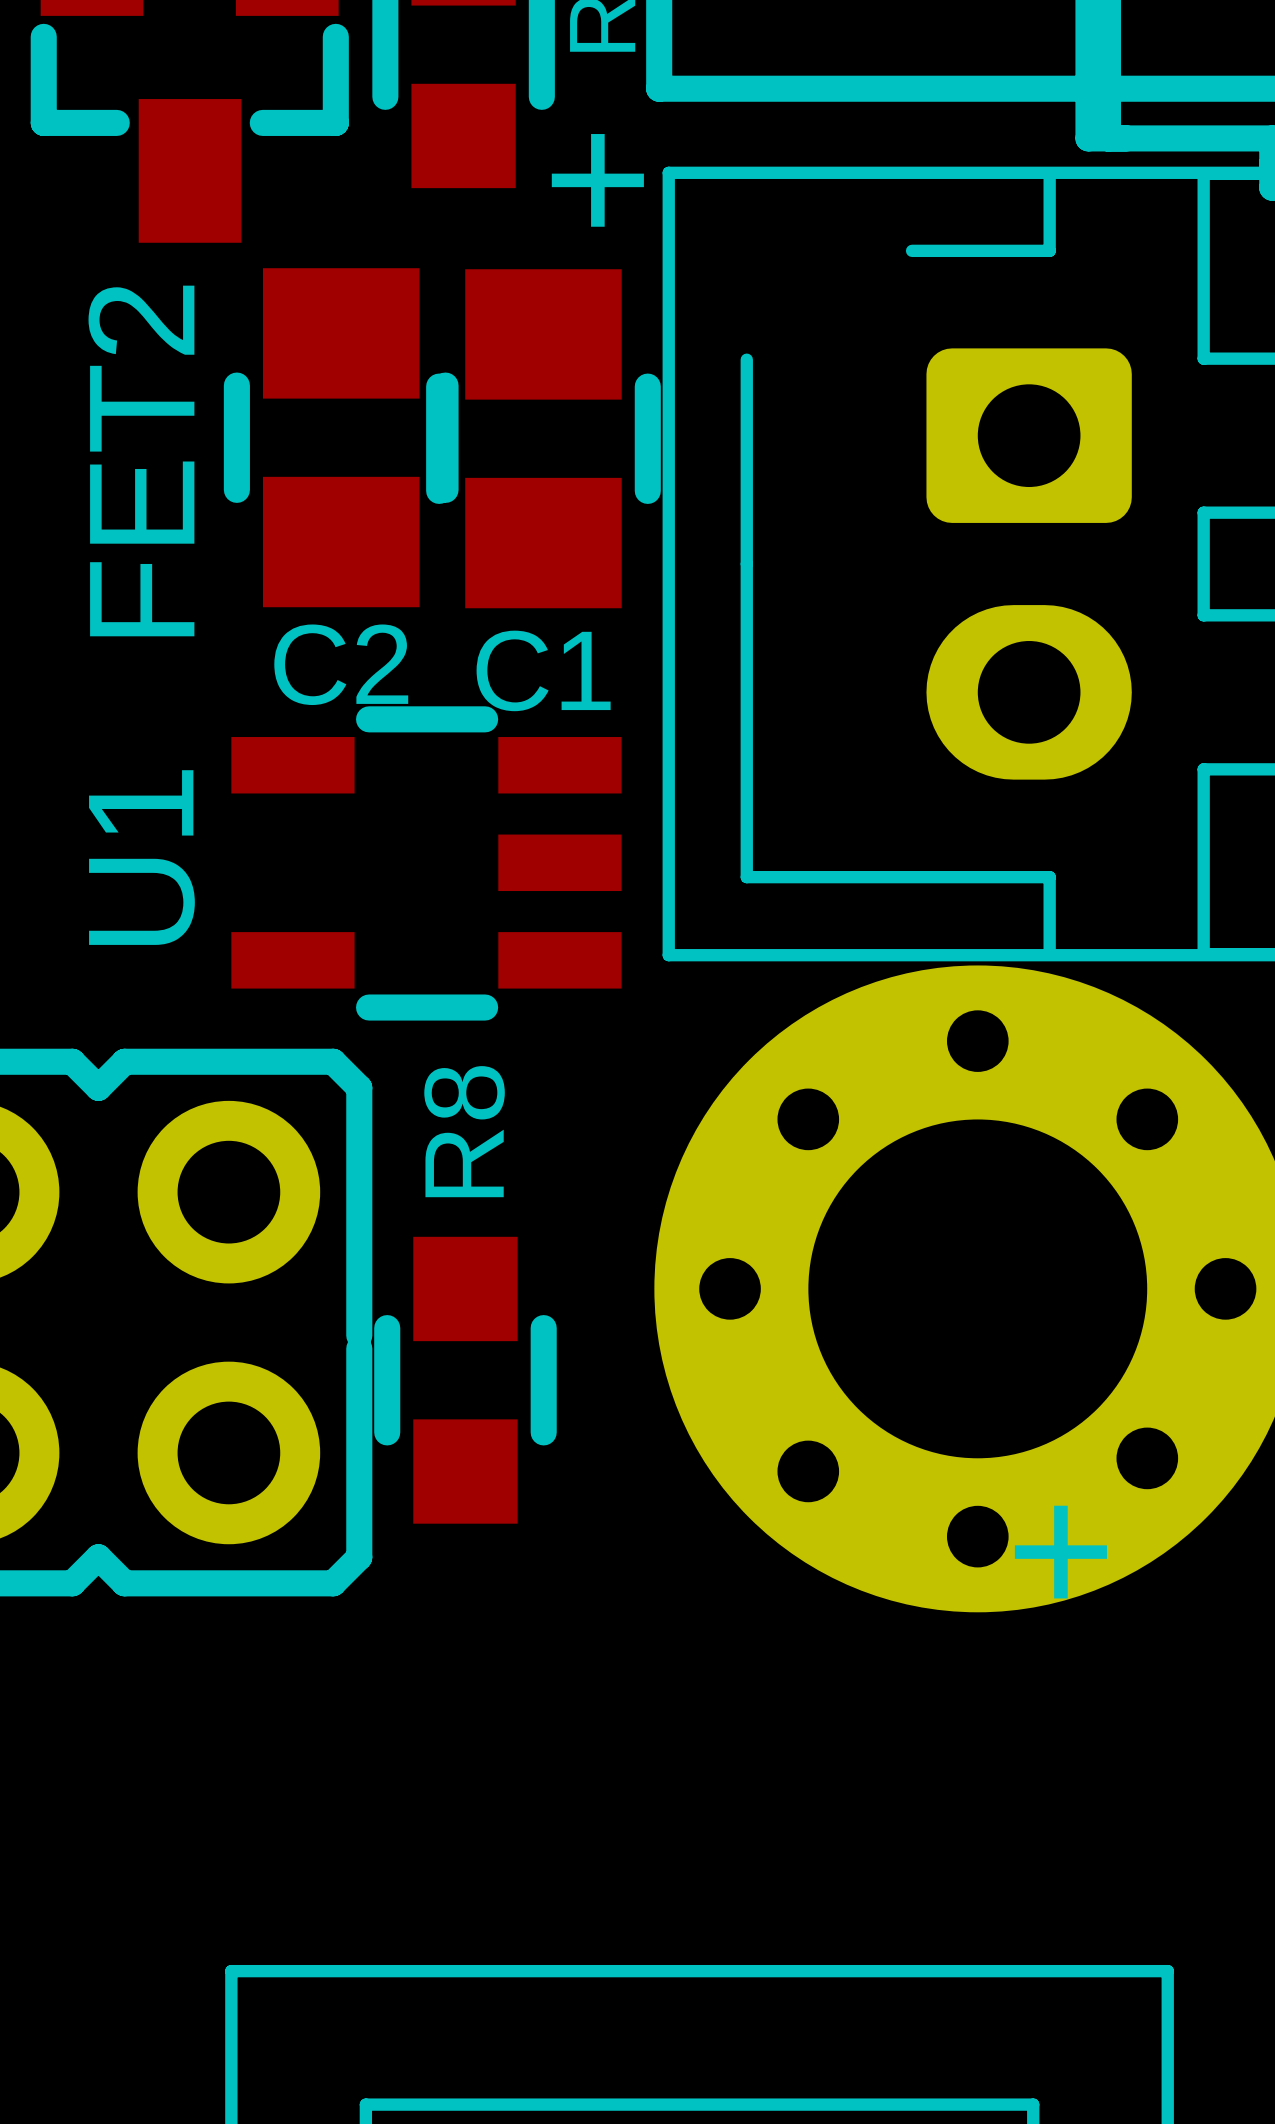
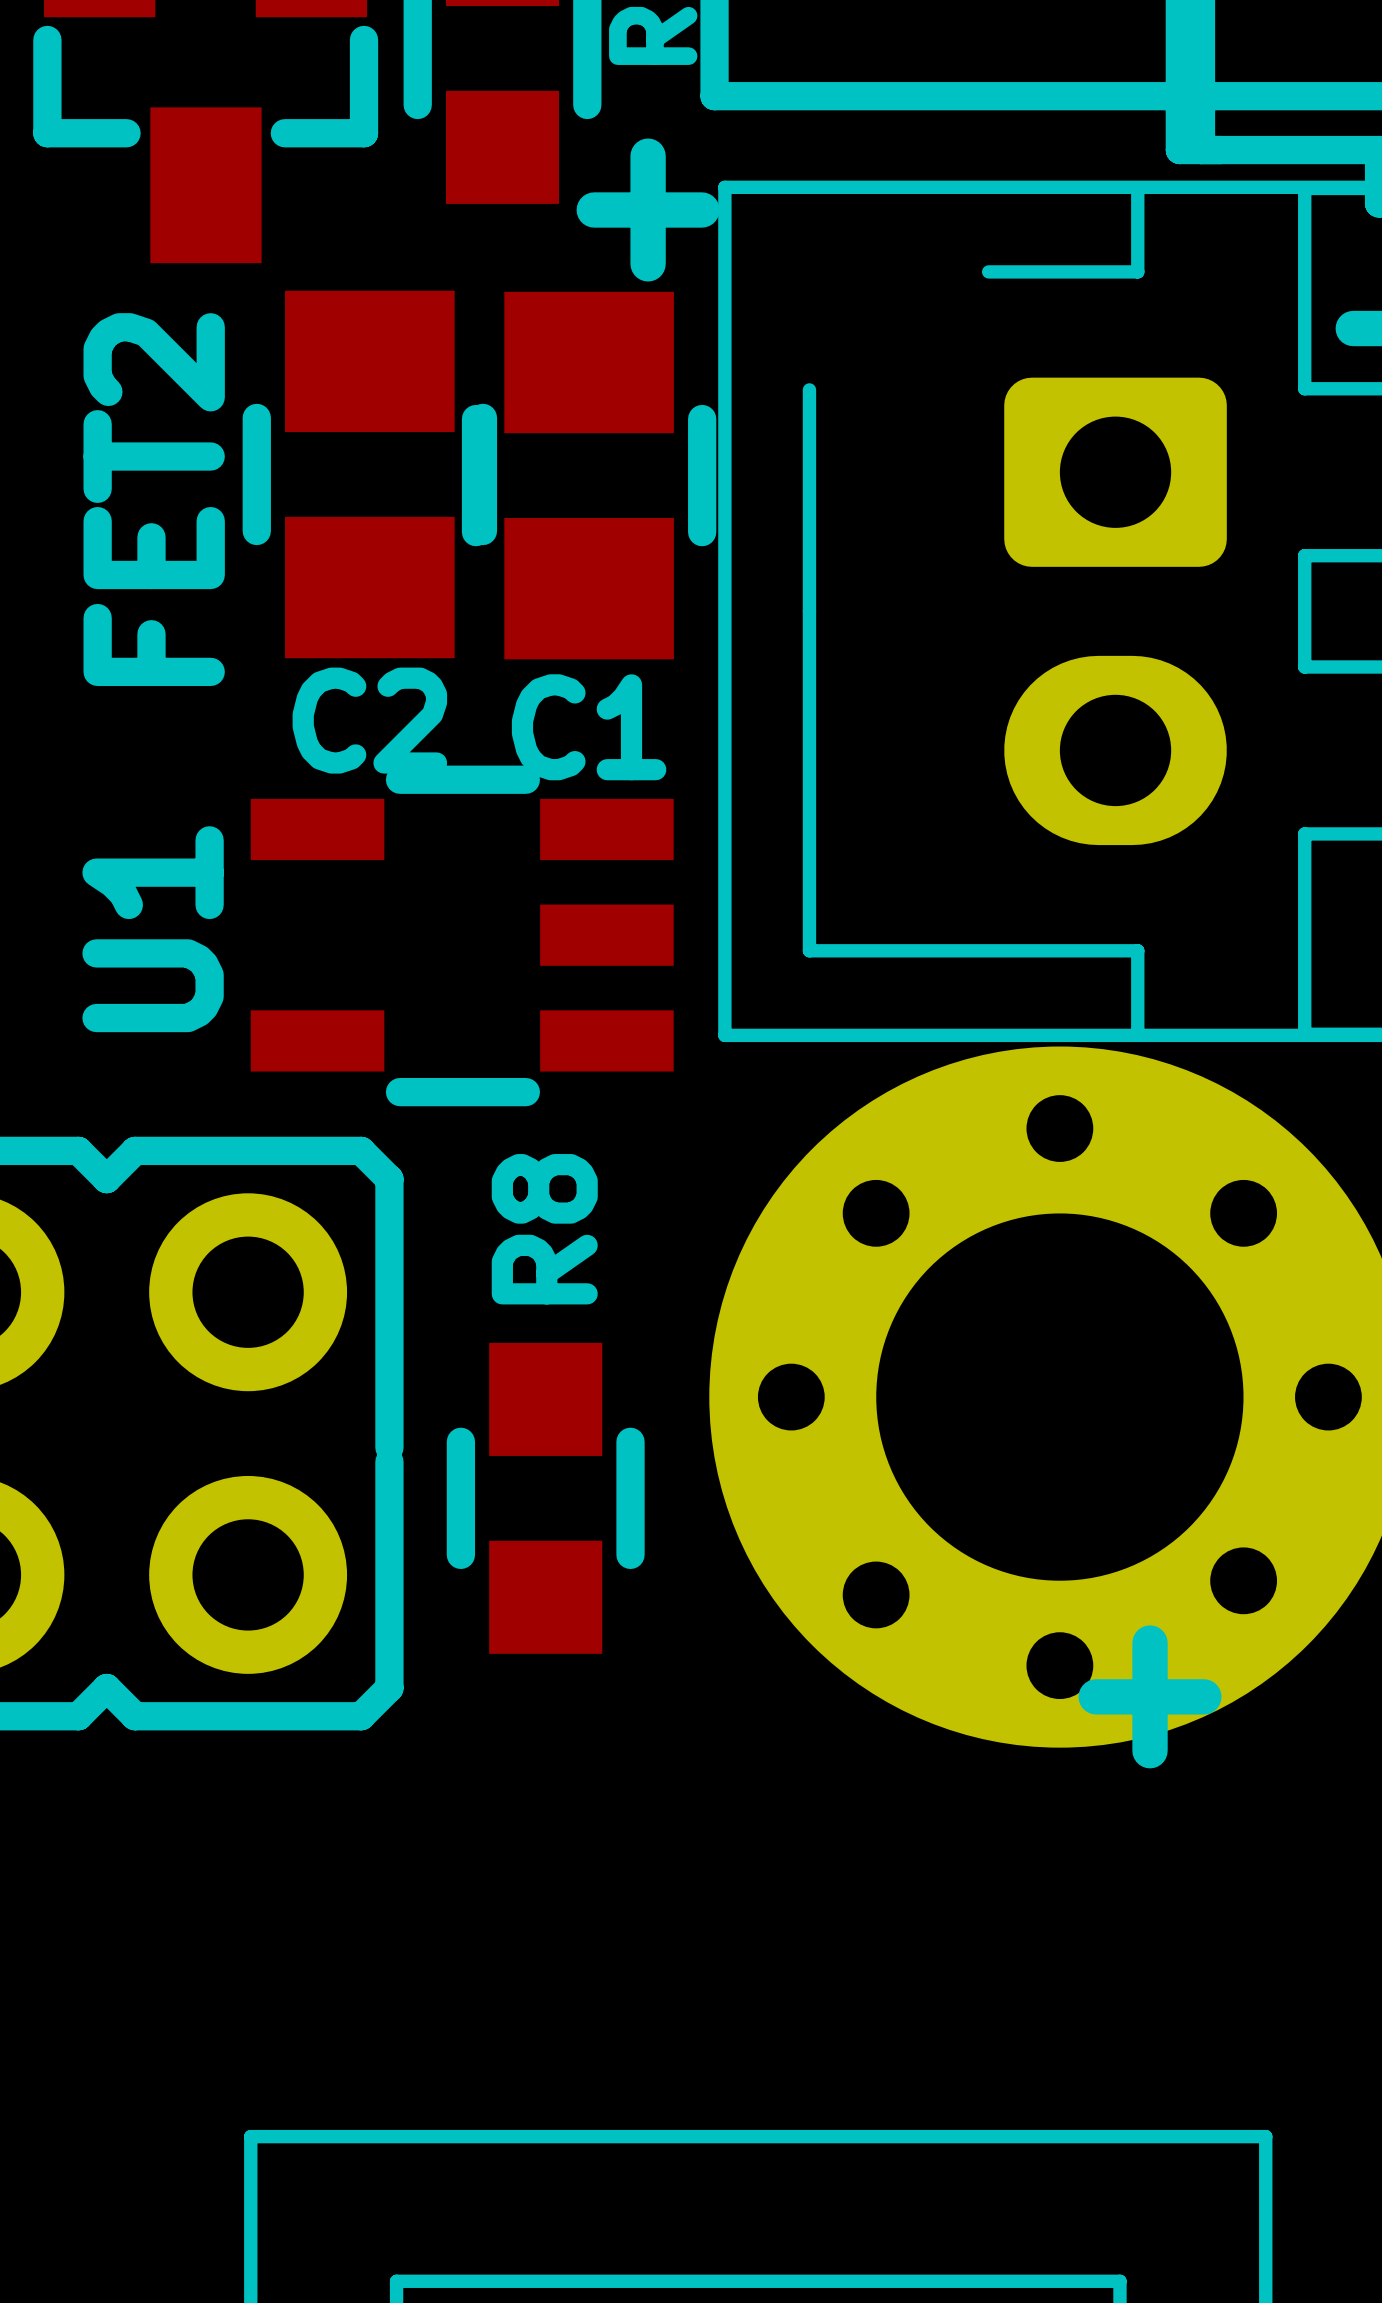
R8 position: (465, 1380) -> (545, 1498)

